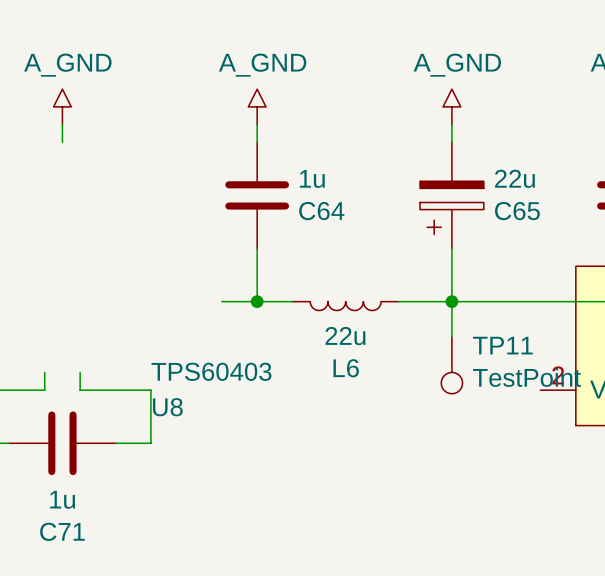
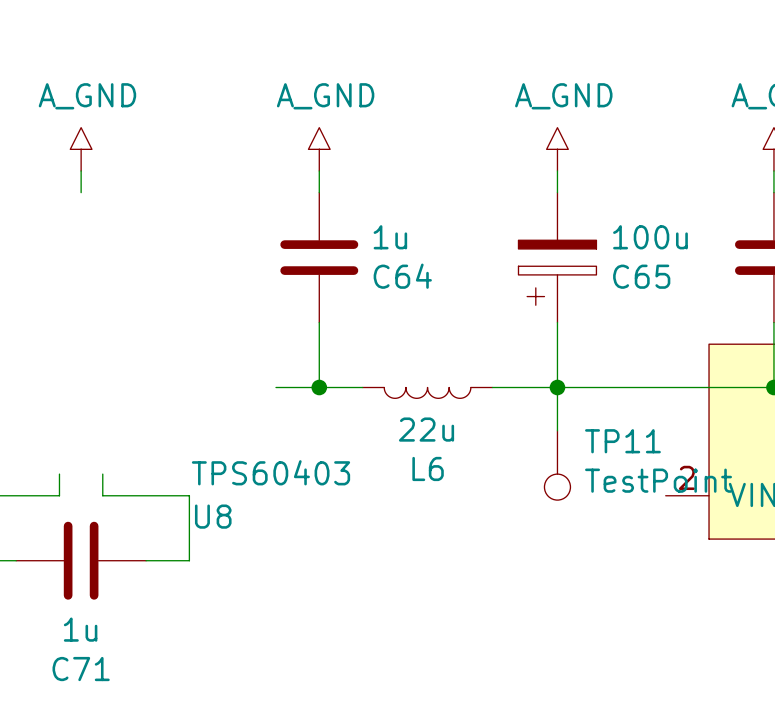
C65 value: 22u (514, 178) -> 100u (650, 237)

